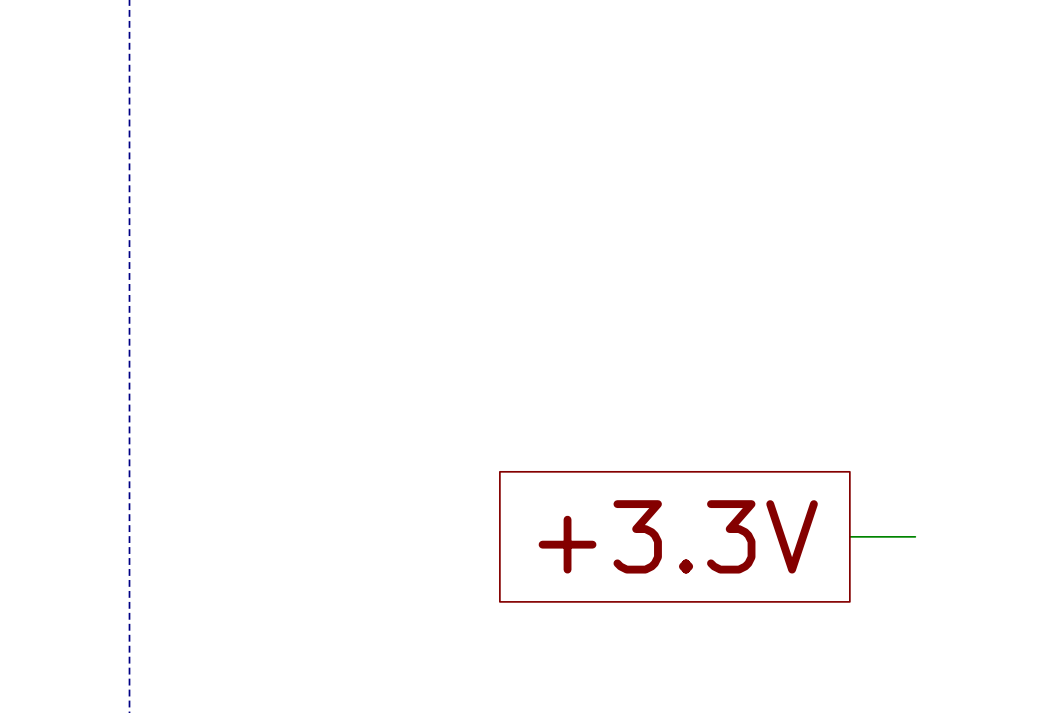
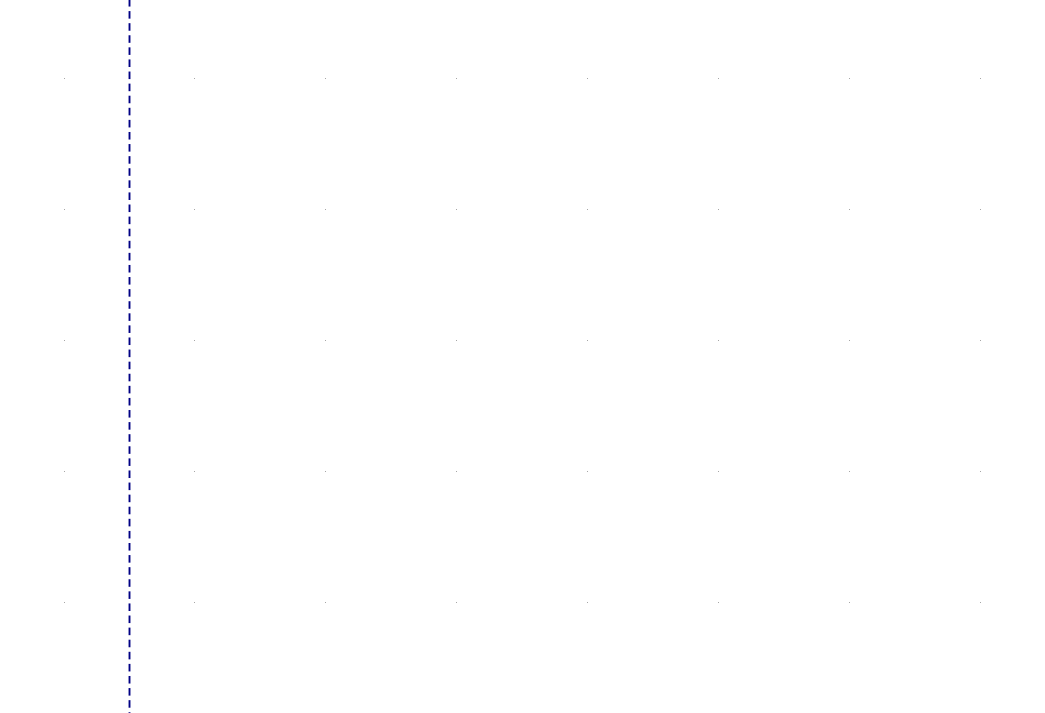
global label: +3.3V (678, 536) -> none
wire: (849, 536) (915, 536) -> none

